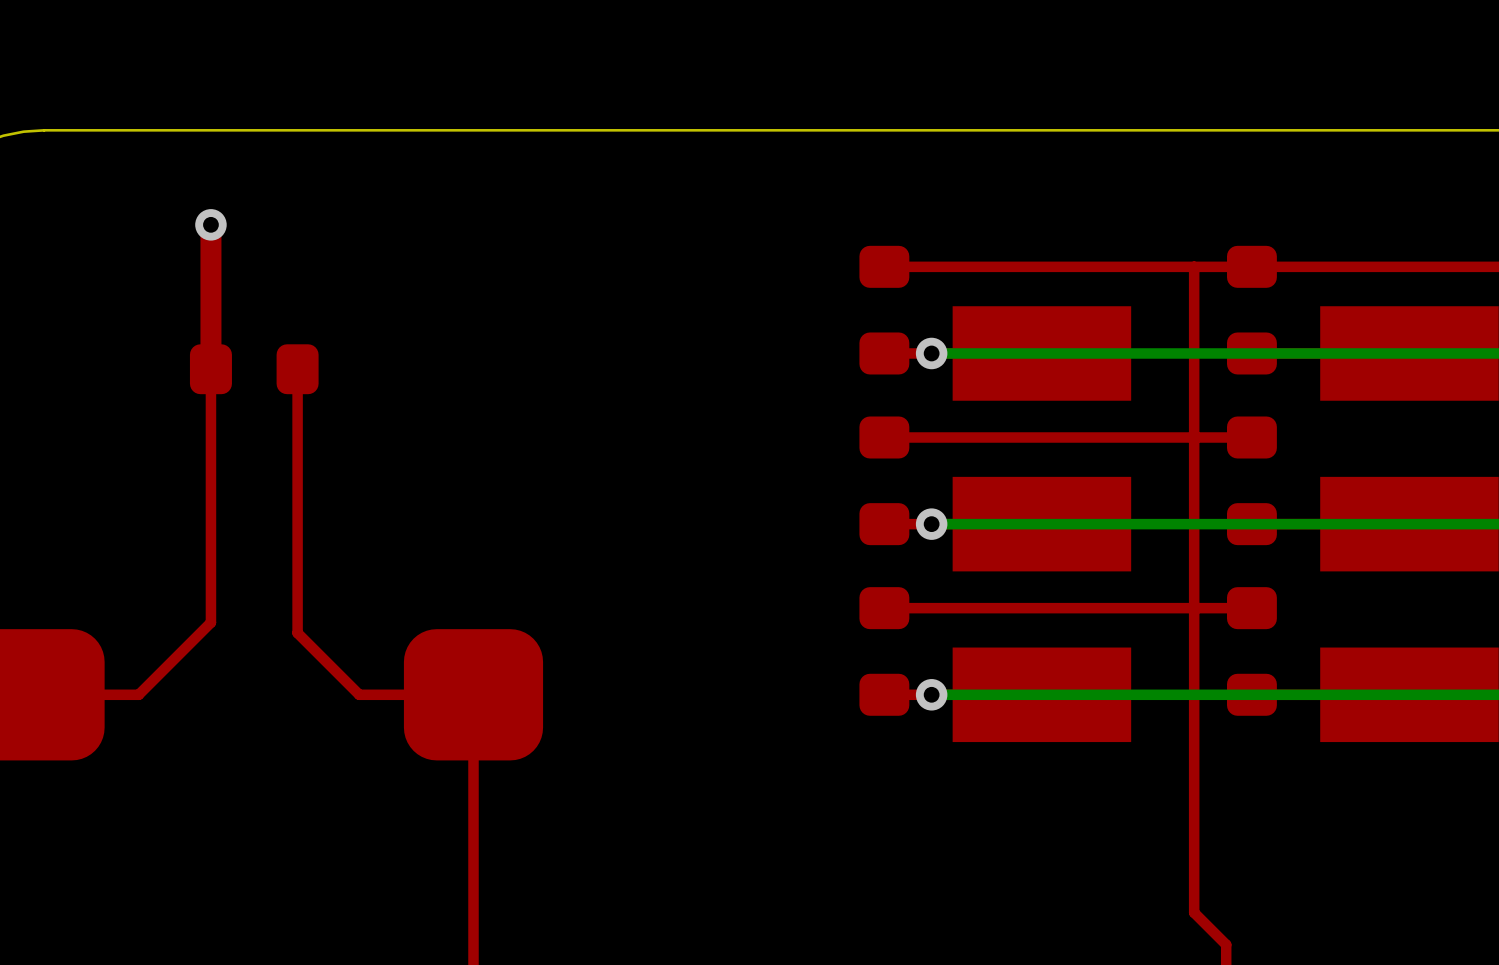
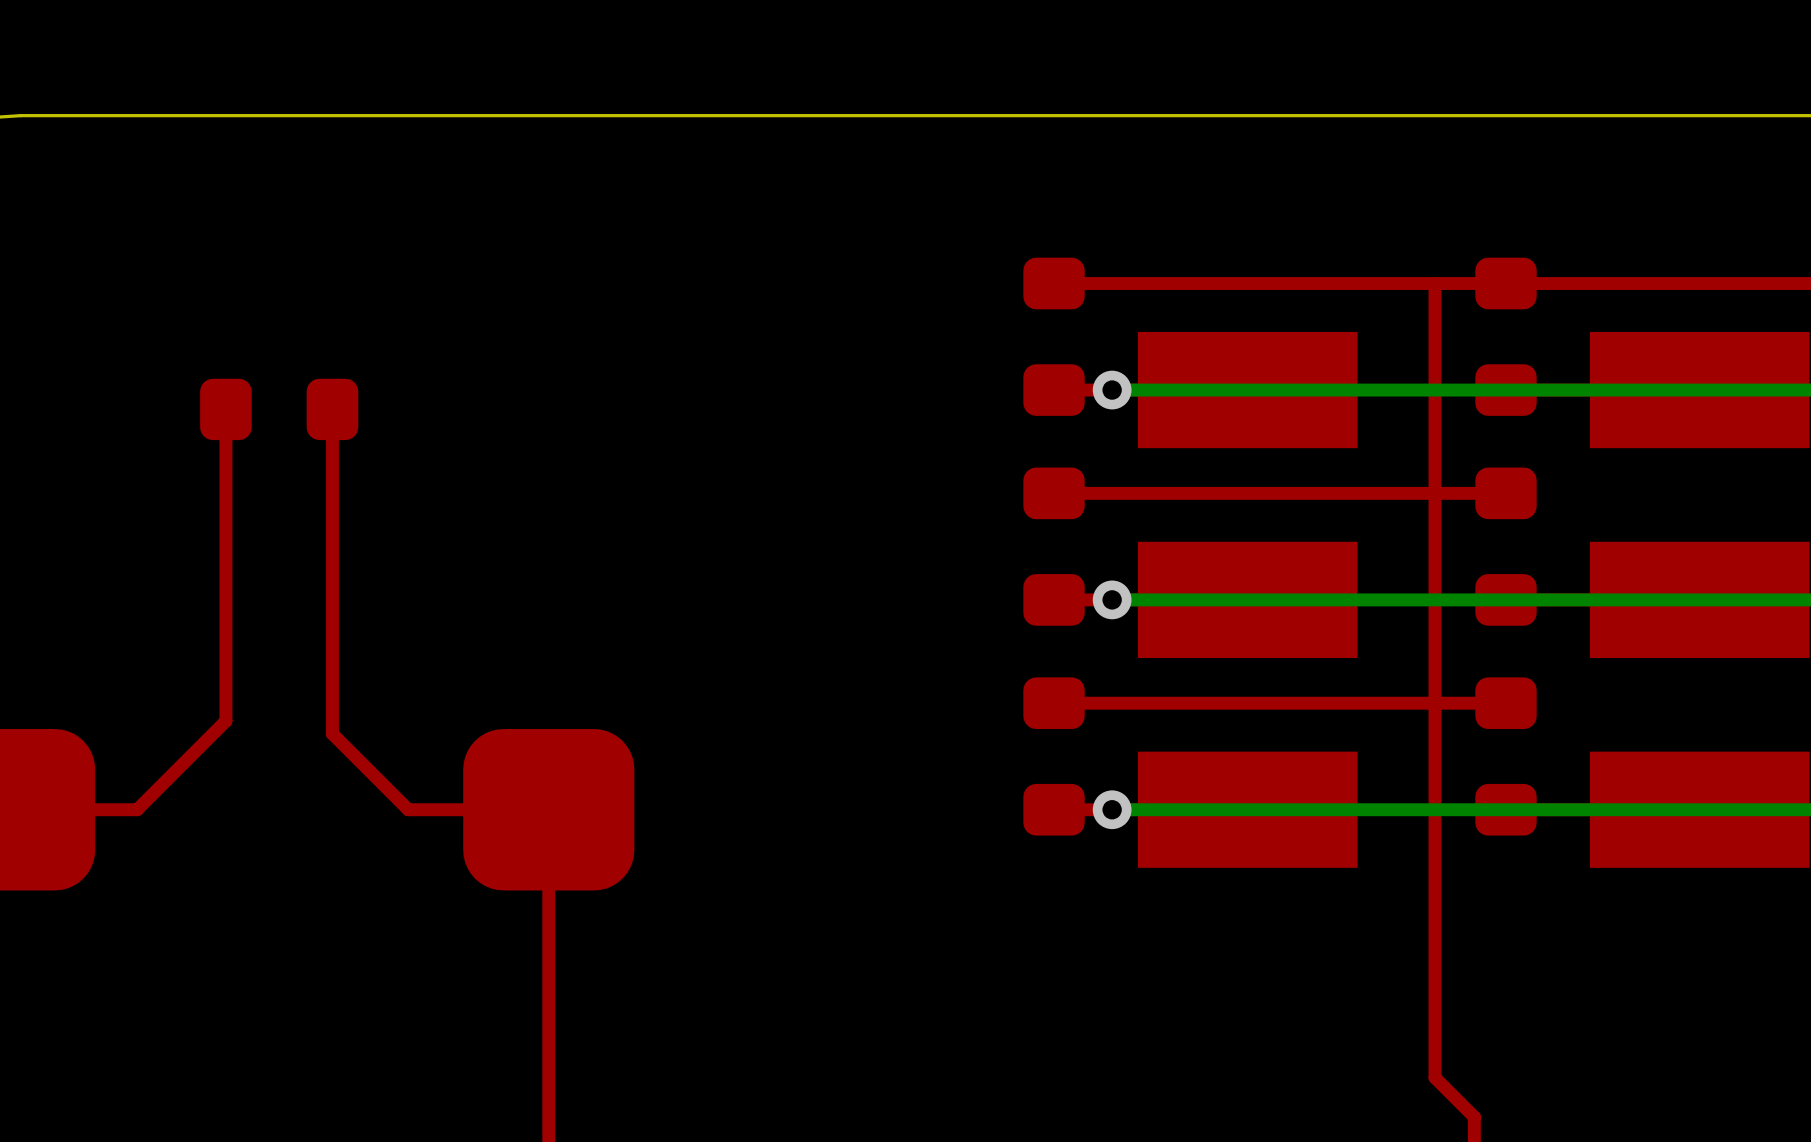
top track: (210, 224) (210, 369) -> none
via: (210, 224) -> none

